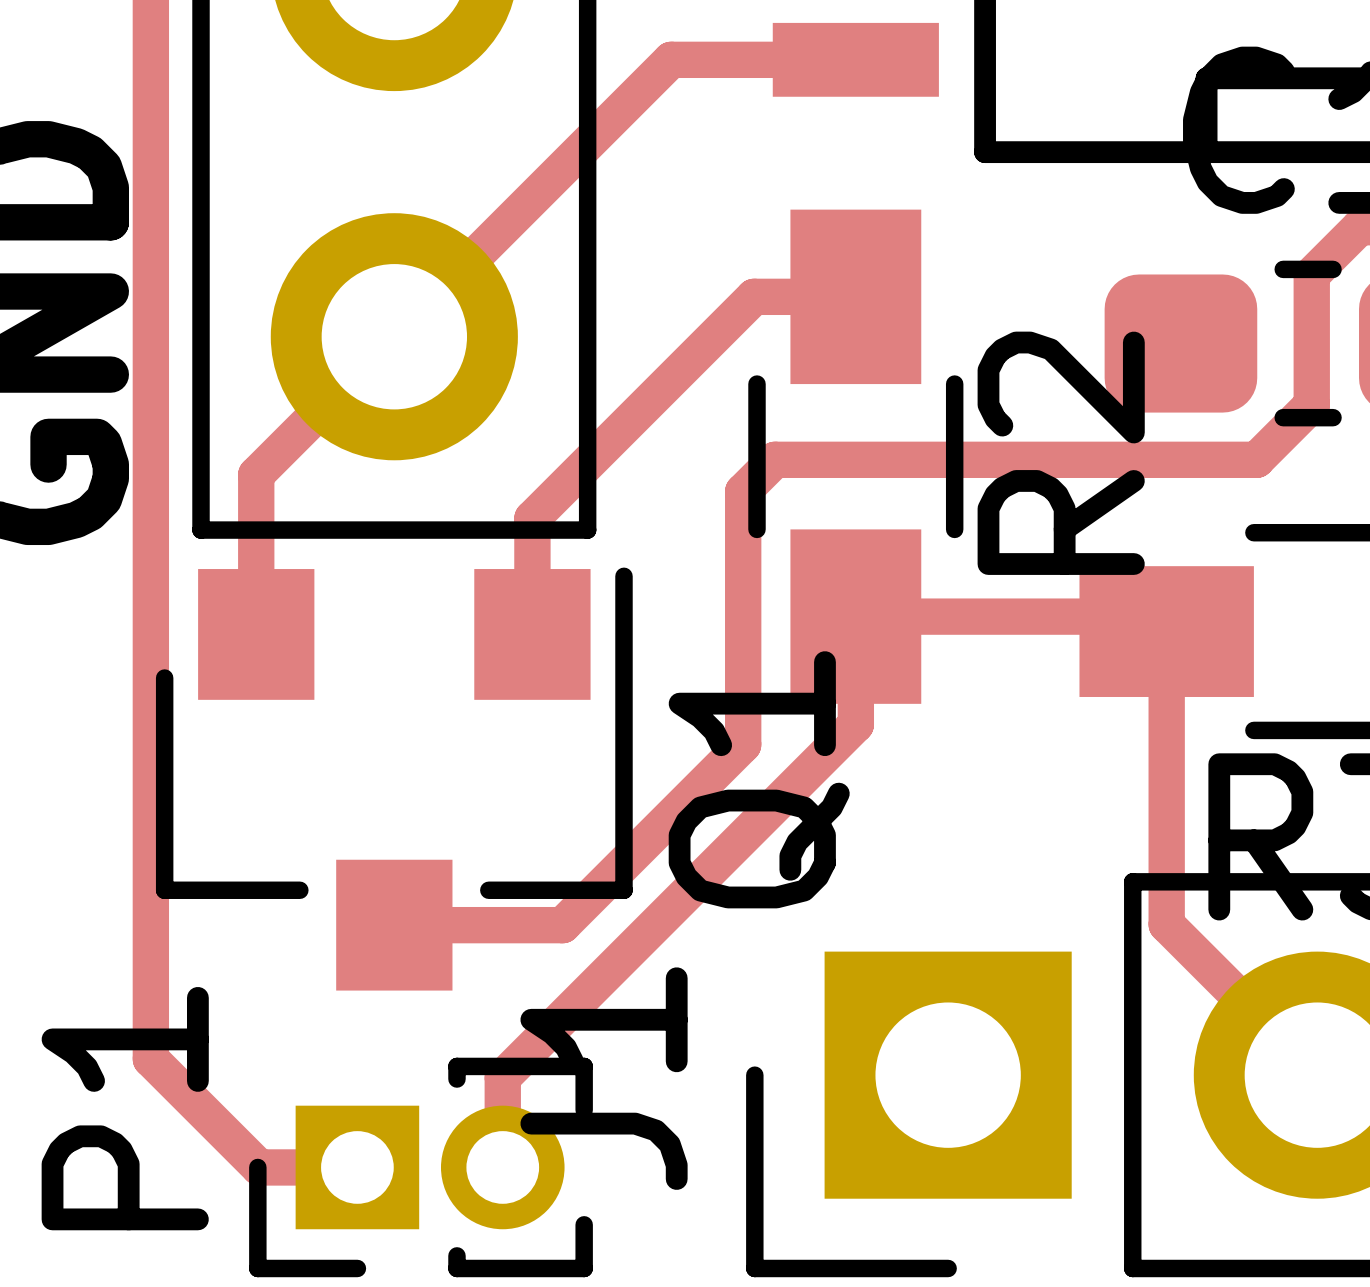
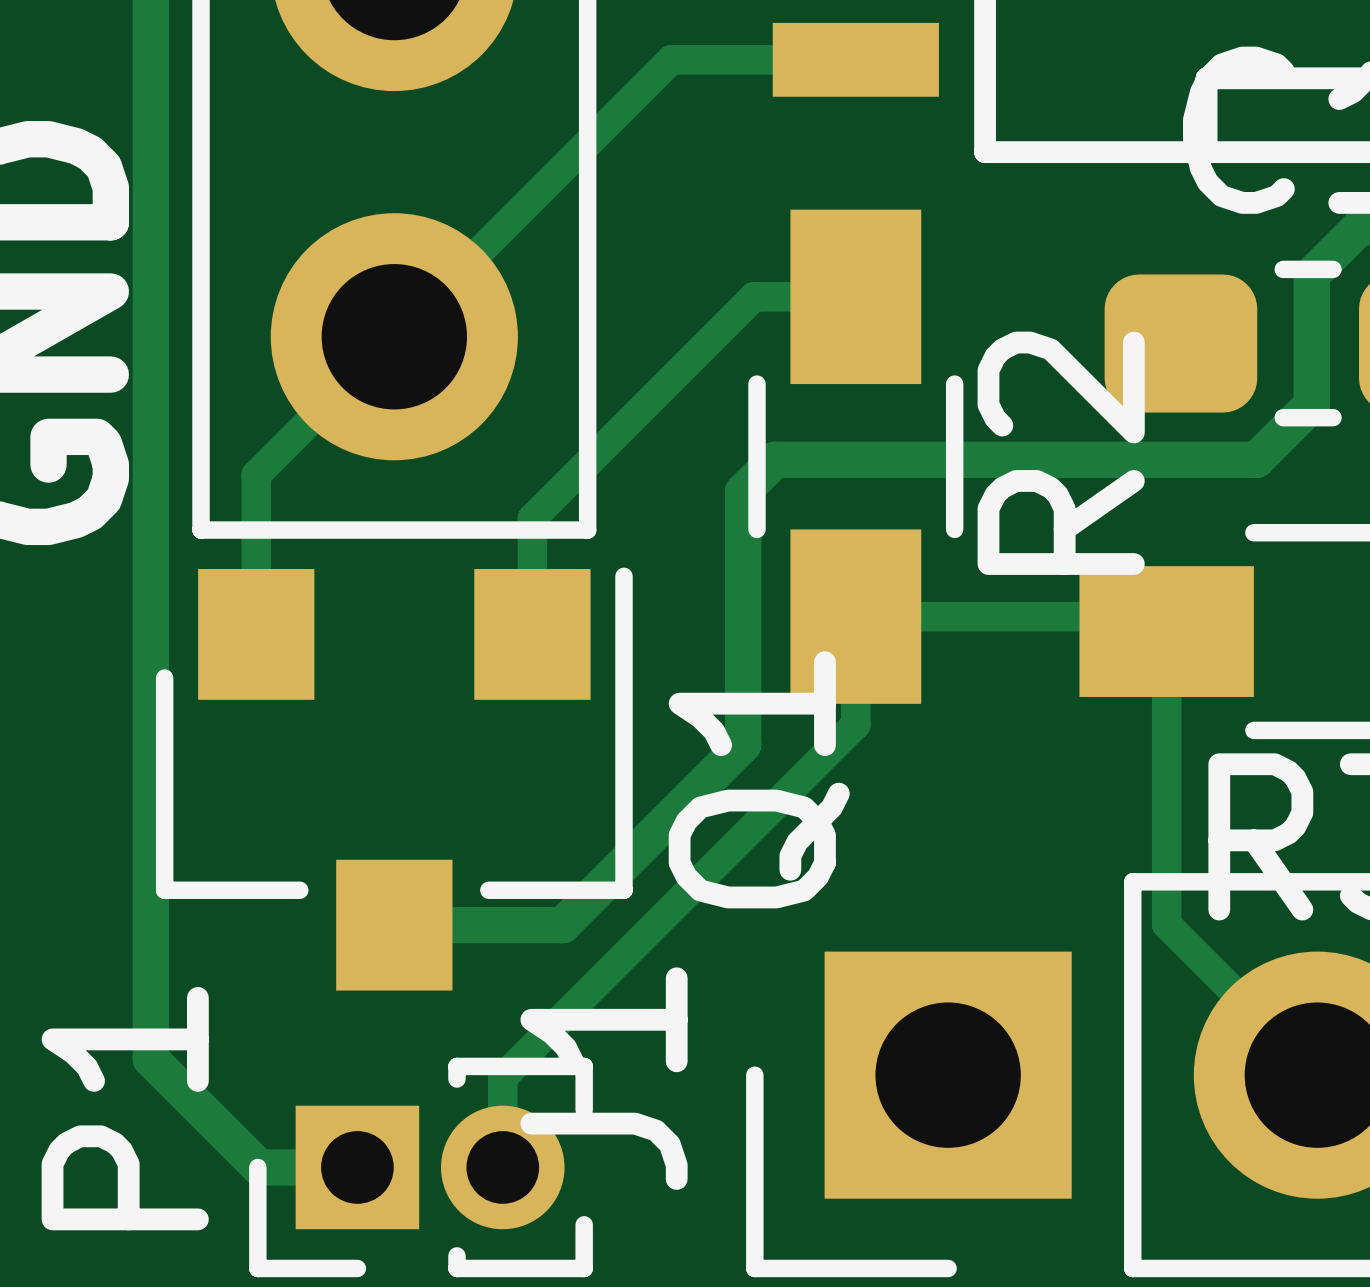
track width: thick (855, 59) (671, 59) (256, 474) (256, 634) -> thin (855, 59) (671, 59) (256, 474) (256, 634)
track width: thick (855, 296) (754, 296) (532, 518) (532, 634) -> thin (855, 296) (754, 296) (532, 518) (532, 634)
track width: thick (1317, 1075) (1166, 924) (1166, 631) (1151, 616) (855, 616) (855, 724) (502, 1077) (502, 1167) -> thin (1317, 1075) (1166, 924) (1166, 631) (1151, 616) (855, 616) (855, 724) (502, 1077) (502, 1167)

